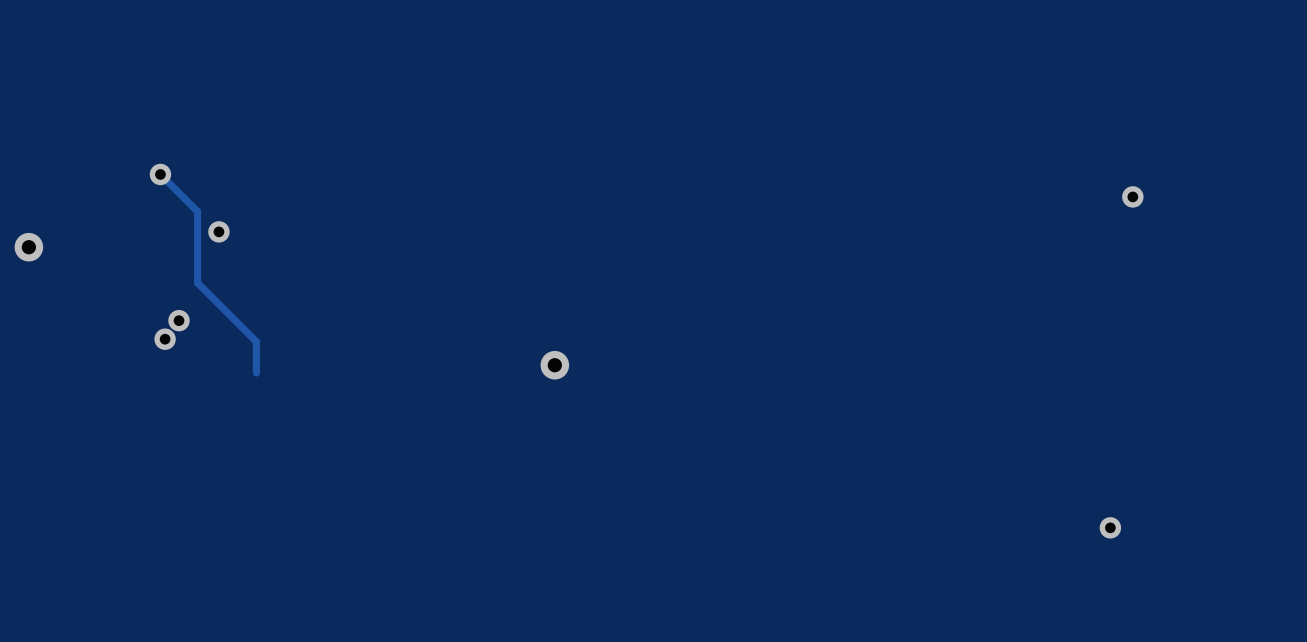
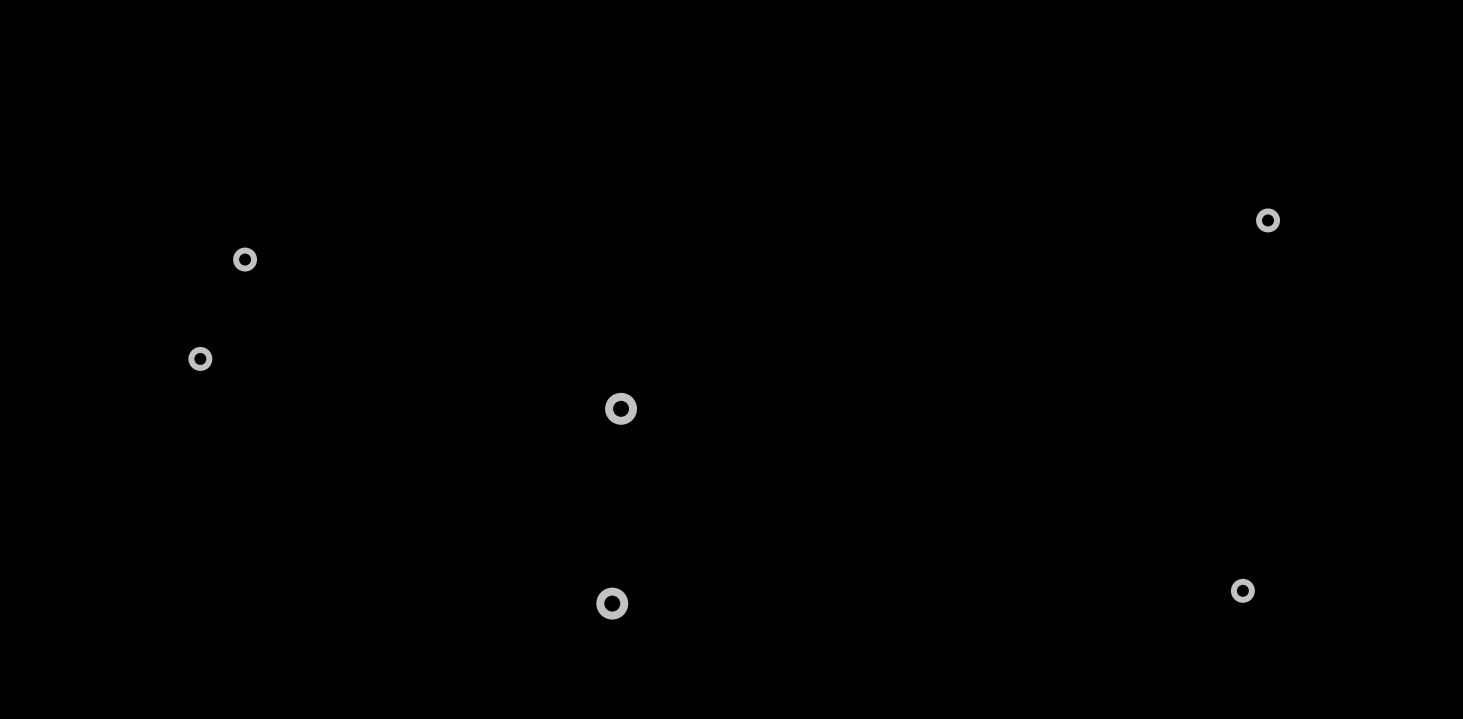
track: (160, 174) (197, 211) (197, 282) (256, 341) (256, 373) -> none
via: (160, 174) -> none
via: (28, 247) -> none
via: (165, 339) -> none
via: none -> (612, 603)

